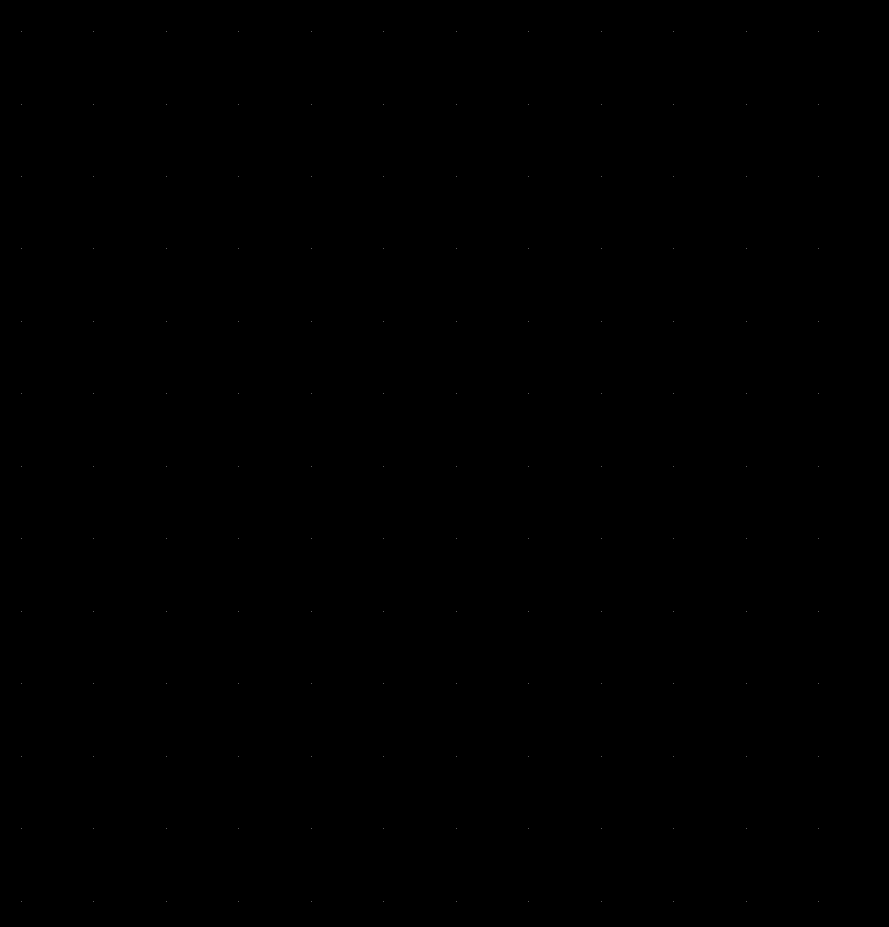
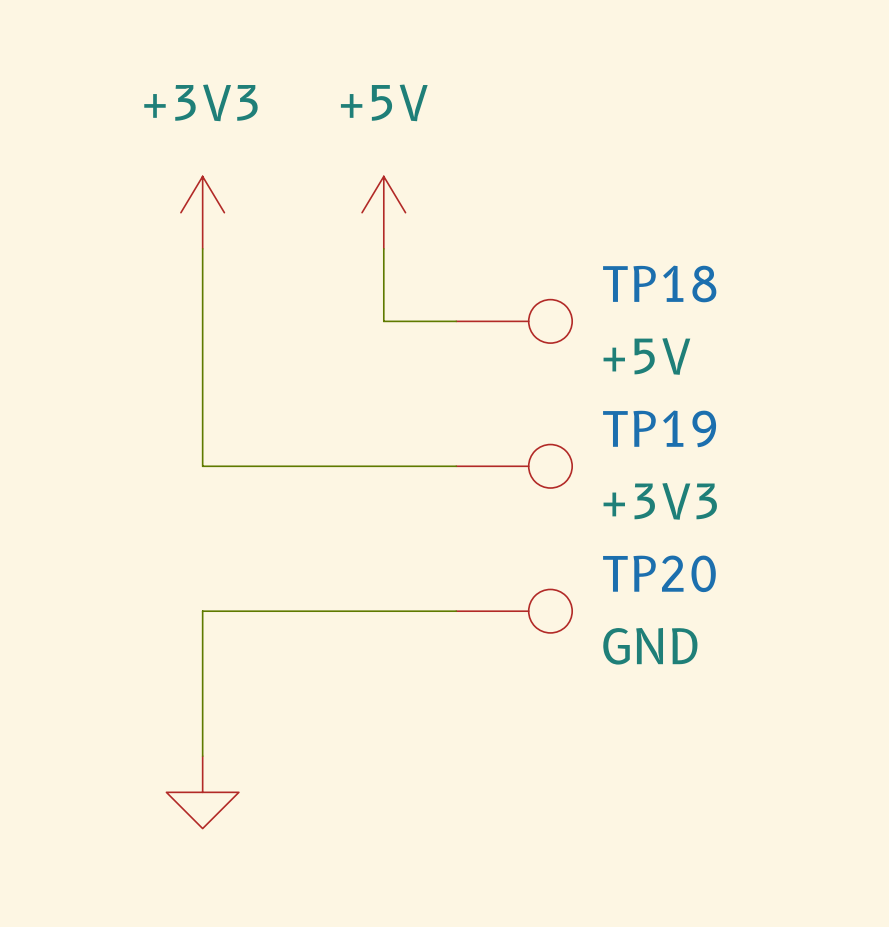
power symbol: none -> +3V3 (202, 212)
power symbol: none -> +5V (383, 212)
wire: none -> (202, 248) (202, 466) (456, 466)
wire: none -> (383, 248) (383, 321) (456, 321)
TP18: none -> +5V (514, 321)
TP19: none -> +3V3 (514, 466)
wire: none -> (456, 611) (202, 611) (202, 756)
TP20: none -> GND (514, 611)
power symbol: none -> (202, 792)

